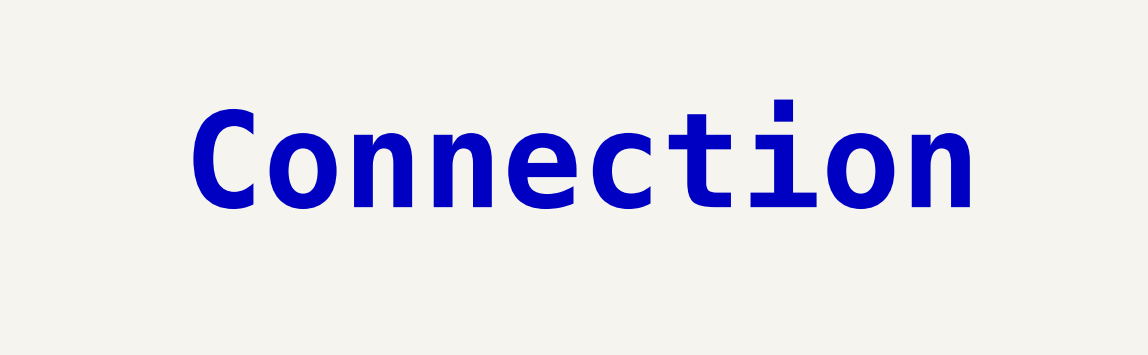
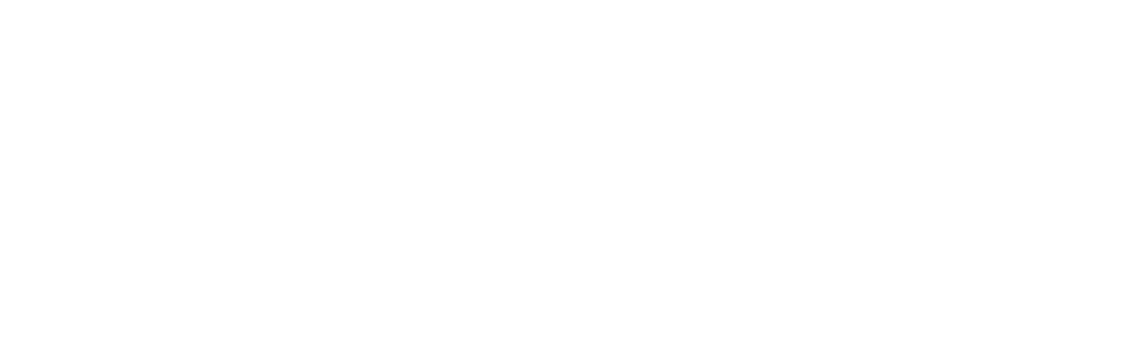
text: Connection (581, 154) -> none

